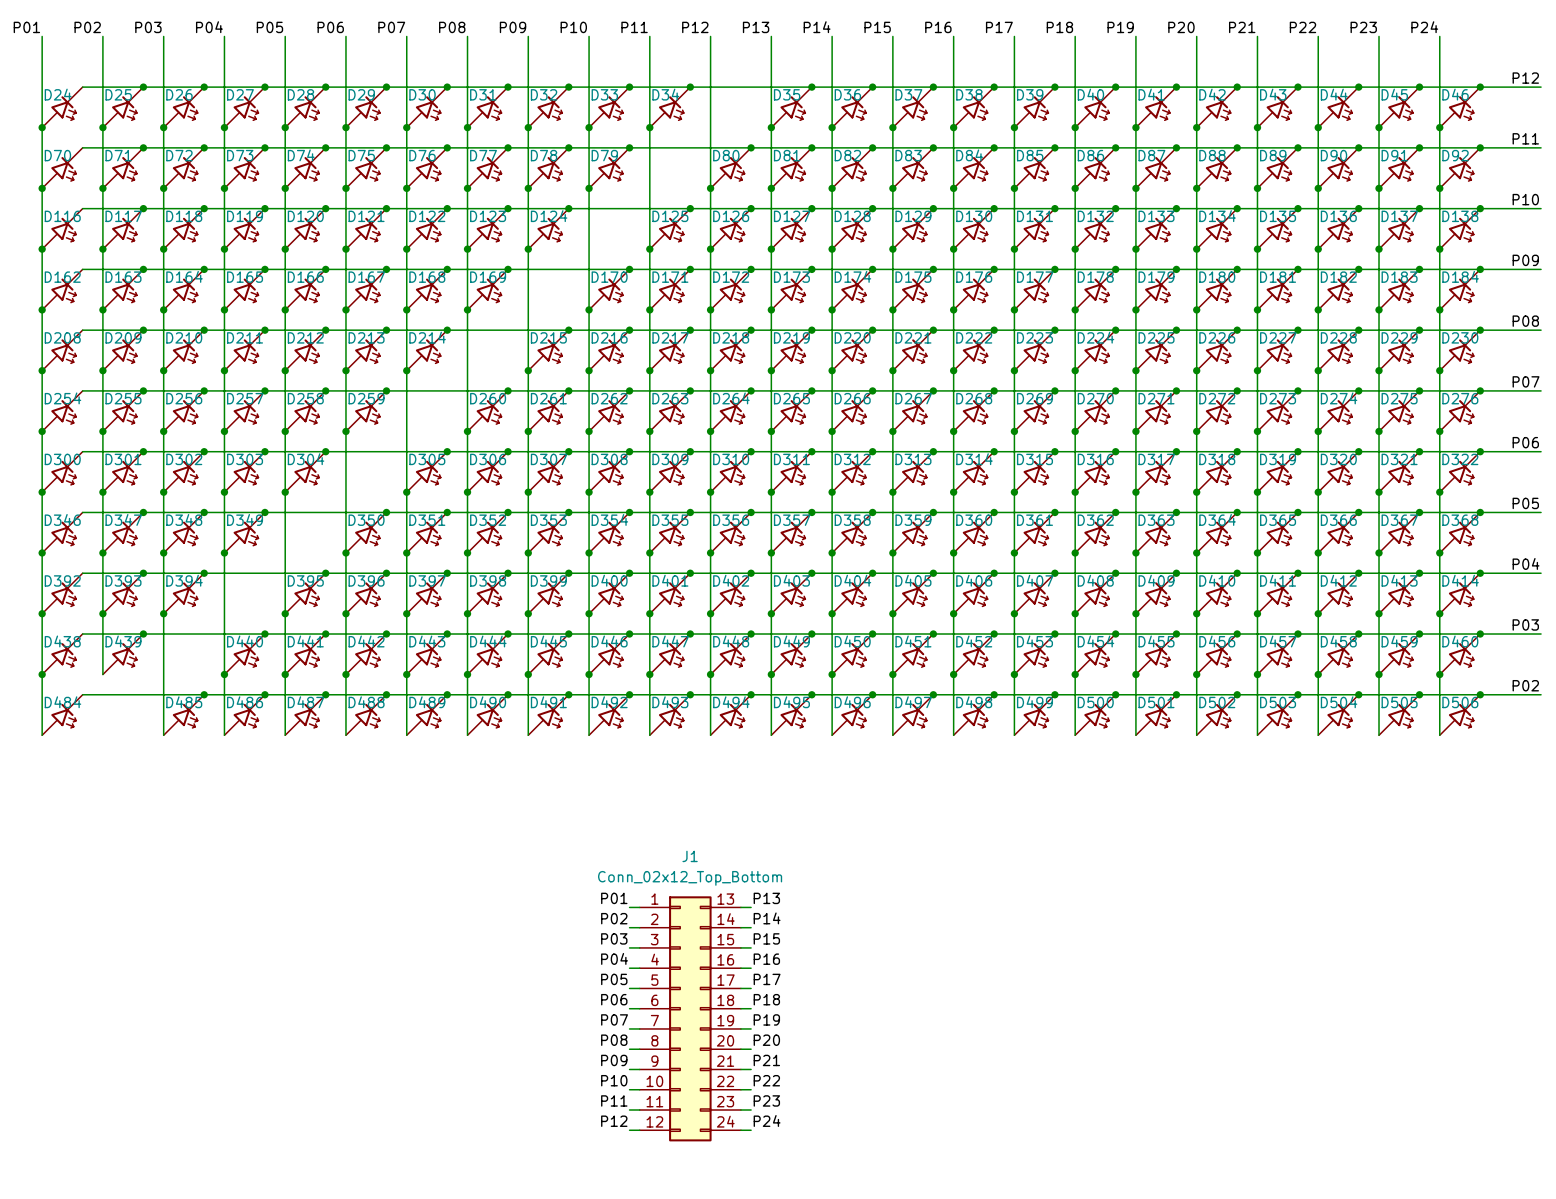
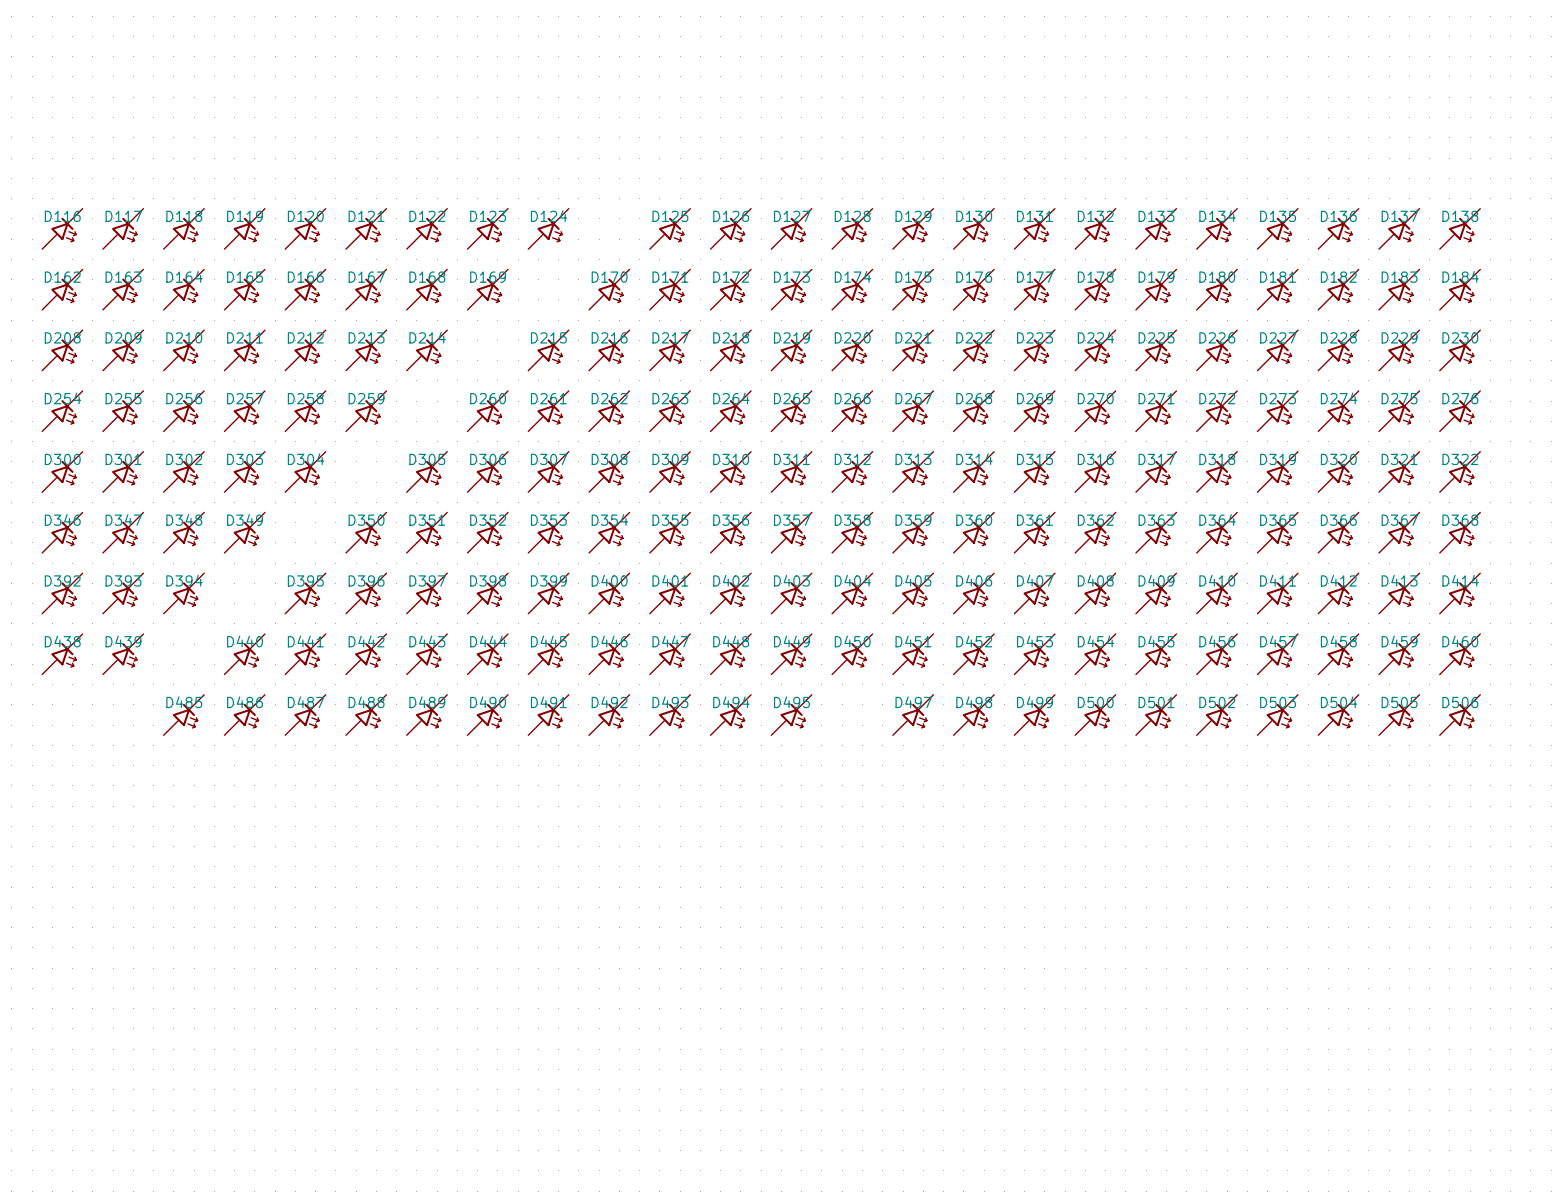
label: P01 (26, 27) -> none
label: P02 (87, 27) -> none
label: P03 (148, 27) -> none
label: P04 (209, 27) -> none
label: P05 (269, 27) -> none
label: P06 (330, 27) -> none
label: P07 (391, 27) -> none
label: P08 (452, 27) -> none
label: P09 (513, 27) -> none
label: P10 (573, 27) -> none
label: P11 (634, 27) -> none
label: P12 (695, 27) -> none
label: P13 (756, 27) -> none
label: P14 (817, 27) -> none
label: P15 (877, 27) -> none
label: P16 (938, 27) -> none
label: P17 (999, 27) -> none
label: P18 (1059, 27) -> none
label: P19 (1120, 27) -> none
label: P20 (1181, 27) -> none
label: P21 (1242, 27) -> none
label: P22 (1302, 27) -> none
label: P23 (1363, 27) -> none
label: P24 (1424, 27) -> none
wire: (42, 36) (42, 735) -> none
wire: (102, 36) (102, 674) -> none
wire: (163, 36) (163, 735) -> none
wire: (224, 36) (224, 735) -> none
wire: (285, 36) (285, 735) -> none
wire: (345, 36) (345, 735) -> none
wire: (406, 36) (406, 735) -> none
wire: (467, 36) (467, 735) -> none
wire: (528, 36) (528, 735) -> none
wire: (589, 36) (589, 735) -> none
wire: (649, 36) (649, 735) -> none
wire: (710, 36) (710, 735) -> none
wire: (771, 36) (771, 735) -> none
wire: (832, 36) (832, 735) -> none
wire: (892, 36) (892, 735) -> none
wire: (953, 36) (953, 735) -> none
wire: (1014, 36) (1014, 735) -> none
wire: (1075, 36) (1075, 735) -> none
wire: (1135, 36) (1135, 735) -> none
wire: (1196, 36) (1196, 735) -> none
wire: (1257, 36) (1257, 735) -> none
wire: (1318, 36) (1318, 735) -> none
wire: (1379, 36) (1379, 735) -> none
wire: (1439, 36) (1439, 735) -> none
label: P12 (1525, 78) -> none
wire: (82, 87) (1541, 87) -> none
junction: (143, 87) -> none
junction: (204, 87) -> none
junction: (264, 87) -> none
junction: (325, 87) -> none
junction: (386, 87) -> none
junction: (447, 87) -> none
junction: (508, 87) -> none
junction: (568, 87) -> none
junction: (629, 87) -> none
junction: (690, 87) -> none
junction: (811, 87) -> none
junction: (872, 87) -> none
junction: (933, 87) -> none
junction: (994, 87) -> none
junction: (1054, 87) -> none
junction: (1115, 87) -> none
junction: (1176, 87) -> none
junction: (1237, 87) -> none
junction: (1297, 87) -> none
junction: (1358, 87) -> none
junction: (1419, 87) -> none
junction: (1480, 87) -> none
D24: (62, 107) -> none
D25: (123, 107) -> none
D26: (183, 107) -> none
D27: (244, 107) -> none
D28: (305, 107) -> none
D29: (366, 107) -> none
D30: (427, 107) -> none
D31: (487, 107) -> none
D32: (548, 107) -> none
D33: (609, 107) -> none
D34: (670, 107) -> none
D35: (791, 107) -> none
D36: (852, 107) -> none
D37: (913, 107) -> none
D38: (973, 107) -> none
D39: (1034, 107) -> none
D40: (1095, 107) -> none
D41: (1156, 107) -> none
D42: (1216, 107) -> none
D43: (1277, 107) -> none
D44: (1338, 107) -> none
D45: (1399, 107) -> none
D46: (1460, 107) -> none
junction: (42, 127) -> none
junction: (102, 127) -> none
junction: (163, 127) -> none
junction: (224, 127) -> none
junction: (285, 127) -> none
junction: (345, 127) -> none
junction: (406, 127) -> none
junction: (467, 127) -> none
junction: (528, 127) -> none
junction: (589, 127) -> none
junction: (649, 127) -> none
junction: (771, 127) -> none
junction: (832, 127) -> none
junction: (892, 127) -> none
junction: (953, 127) -> none
junction: (1014, 127) -> none
junction: (1075, 127) -> none
junction: (1135, 127) -> none
junction: (1196, 127) -> none
junction: (1257, 127) -> none
junction: (1318, 127) -> none
junction: (1379, 127) -> none
junction: (1439, 127) -> none
label: P11 (1525, 138) -> none
wire: (82, 147) (1541, 147) -> none
junction: (143, 147) -> none
junction: (204, 147) -> none
junction: (264, 147) -> none
junction: (325, 147) -> none
junction: (386, 147) -> none
junction: (447, 147) -> none
junction: (508, 147) -> none
junction: (568, 147) -> none
junction: (629, 147) -> none
junction: (751, 147) -> none
junction: (811, 147) -> none
junction: (872, 147) -> none
junction: (933, 147) -> none
junction: (994, 147) -> none
junction: (1054, 147) -> none
junction: (1115, 147) -> none
junction: (1176, 147) -> none
junction: (1237, 147) -> none
junction: (1297, 147) -> none
junction: (1358, 147) -> none
junction: (1419, 147) -> none
junction: (1480, 147) -> none
D70: (62, 168) -> none
D71: (123, 168) -> none
D72: (183, 168) -> none
D73: (244, 168) -> none
D74: (305, 168) -> none
D75: (366, 168) -> none
D76: (427, 168) -> none
D77: (487, 168) -> none
D78: (548, 168) -> none
D79: (609, 168) -> none
D80: (730, 168) -> none
D81: (791, 168) -> none
D82: (852, 168) -> none
D83: (913, 168) -> none
D84: (973, 168) -> none
D85: (1034, 168) -> none
D86: (1095, 168) -> none
D87: (1156, 168) -> none
D88: (1216, 168) -> none
D89: (1277, 168) -> none
D90: (1338, 168) -> none
D91: (1399, 168) -> none
D92: (1460, 168) -> none
junction: (42, 188) -> none
junction: (102, 188) -> none
junction: (163, 188) -> none
junction: (224, 188) -> none
junction: (285, 188) -> none
junction: (345, 188) -> none
junction: (406, 188) -> none
junction: (467, 188) -> none
junction: (528, 188) -> none
junction: (589, 188) -> none
junction: (710, 188) -> none
junction: (771, 188) -> none
junction: (832, 188) -> none
junction: (892, 188) -> none
junction: (953, 188) -> none
junction: (1014, 188) -> none
junction: (1075, 188) -> none
junction: (1135, 188) -> none
junction: (1196, 188) -> none
junction: (1257, 188) -> none
junction: (1318, 188) -> none
junction: (1379, 188) -> none
junction: (1439, 188) -> none
label: P10 (1525, 199) -> none
wire: (82, 208) (1541, 208) -> none
junction: (143, 208) -> none
junction: (204, 208) -> none
junction: (264, 208) -> none
junction: (325, 208) -> none
junction: (386, 208) -> none
junction: (447, 208) -> none
junction: (508, 208) -> none
junction: (568, 208) -> none
junction: (690, 208) -> none
junction: (751, 208) -> none
junction: (811, 208) -> none
junction: (872, 208) -> none
junction: (933, 208) -> none
junction: (994, 208) -> none
junction: (1054, 208) -> none
junction: (1115, 208) -> none
junction: (1176, 208) -> none
junction: (1237, 208) -> none
junction: (1297, 208) -> none
junction: (1358, 208) -> none
junction: (1419, 208) -> none
junction: (1480, 208) -> none
junction: (42, 249) -> none
junction: (102, 249) -> none
junction: (163, 249) -> none
junction: (224, 249) -> none
junction: (285, 249) -> none
junction: (345, 249) -> none
junction: (406, 249) -> none
junction: (467, 249) -> none
junction: (528, 249) -> none
junction: (649, 249) -> none
junction: (710, 249) -> none
junction: (771, 249) -> none
junction: (832, 249) -> none
junction: (892, 249) -> none
junction: (953, 249) -> none
junction: (1014, 249) -> none
junction: (1075, 249) -> none
junction: (1135, 249) -> none
junction: (1196, 249) -> none
junction: (1257, 249) -> none
junction: (1318, 249) -> none
junction: (1379, 249) -> none
junction: (1439, 249) -> none
label: P09 (1525, 260) -> none
wire: (82, 269) (1541, 269) -> none
junction: (143, 269) -> none
junction: (204, 269) -> none
junction: (264, 269) -> none
junction: (325, 269) -> none
junction: (386, 269) -> none
junction: (447, 269) -> none
junction: (508, 269) -> none
junction: (629, 269) -> none
junction: (690, 269) -> none
junction: (751, 269) -> none
junction: (811, 269) -> none
junction: (872, 269) -> none
junction: (933, 269) -> none
junction: (994, 269) -> none
junction: (1054, 269) -> none
junction: (1115, 269) -> none
junction: (1176, 269) -> none
junction: (1237, 269) -> none
junction: (1297, 269) -> none
junction: (1358, 269) -> none
junction: (1419, 269) -> none
junction: (1480, 269) -> none
junction: (42, 309) -> none
junction: (102, 309) -> none
junction: (163, 309) -> none
junction: (224, 309) -> none
junction: (285, 309) -> none
junction: (345, 309) -> none
junction: (406, 309) -> none
junction: (467, 309) -> none
junction: (589, 309) -> none
junction: (649, 309) -> none
junction: (710, 309) -> none
junction: (771, 309) -> none
junction: (832, 309) -> none
junction: (892, 309) -> none
junction: (953, 309) -> none
junction: (1014, 309) -> none
junction: (1075, 309) -> none
junction: (1135, 309) -> none
junction: (1196, 309) -> none
junction: (1257, 309) -> none
junction: (1318, 309) -> none
junction: (1379, 309) -> none
junction: (1439, 309) -> none
label: P08 (1525, 321) -> none
wire: (82, 330) (1541, 330) -> none
junction: (143, 330) -> none
junction: (204, 330) -> none
junction: (264, 330) -> none
junction: (325, 330) -> none
junction: (386, 330) -> none
junction: (447, 330) -> none
junction: (568, 330) -> none
junction: (629, 330) -> none
junction: (690, 330) -> none
junction: (751, 330) -> none
junction: (811, 330) -> none
junction: (872, 330) -> none
junction: (933, 330) -> none
junction: (994, 330) -> none
junction: (1054, 330) -> none
junction: (1115, 330) -> none
junction: (1176, 330) -> none
junction: (1237, 330) -> none
junction: (1297, 330) -> none
junction: (1358, 330) -> none
junction: (1419, 330) -> none
junction: (1480, 330) -> none
junction: (42, 370) -> none
junction: (102, 370) -> none
junction: (163, 370) -> none
junction: (224, 370) -> none
junction: (285, 370) -> none
junction: (345, 370) -> none
junction: (406, 370) -> none
junction: (528, 370) -> none
junction: (589, 370) -> none
junction: (649, 370) -> none
junction: (710, 370) -> none
junction: (771, 370) -> none
junction: (832, 370) -> none
junction: (892, 370) -> none
junction: (953, 370) -> none
junction: (1014, 370) -> none
junction: (1075, 370) -> none
junction: (1135, 370) -> none
junction: (1196, 370) -> none
junction: (1257, 370) -> none
junction: (1318, 370) -> none
junction: (1379, 370) -> none
junction: (1439, 370) -> none
label: P07 (1526, 381) -> none
wire: (82, 390) (1541, 390) -> none
junction: (143, 390) -> none
junction: (204, 390) -> none
junction: (264, 390) -> none
junction: (325, 390) -> none
junction: (386, 390) -> none
junction: (508, 390) -> none
junction: (568, 390) -> none
junction: (629, 390) -> none
junction: (690, 390) -> none
junction: (751, 390) -> none
junction: (811, 390) -> none
junction: (872, 390) -> none
junction: (933, 390) -> none
junction: (994, 390) -> none
junction: (1054, 390) -> none
junction: (1115, 390) -> none
junction: (1176, 390) -> none
junction: (1237, 390) -> none
junction: (1297, 390) -> none
junction: (1358, 390) -> none
junction: (1419, 390) -> none
junction: (1480, 390) -> none
junction: (42, 431) -> none
junction: (102, 431) -> none
junction: (163, 431) -> none
junction: (224, 431) -> none
junction: (285, 431) -> none
junction: (345, 431) -> none
junction: (467, 431) -> none
junction: (528, 431) -> none
junction: (589, 431) -> none
junction: (649, 431) -> none
junction: (710, 431) -> none
junction: (771, 431) -> none
junction: (832, 431) -> none
junction: (892, 431) -> none
junction: (953, 431) -> none
junction: (1014, 431) -> none
junction: (1075, 431) -> none
junction: (1135, 431) -> none
junction: (1196, 431) -> none
junction: (1257, 431) -> none
junction: (1318, 431) -> none
junction: (1379, 431) -> none
junction: (1439, 431) -> none
label: P06 (1525, 442) -> none
wire: (82, 451) (1541, 451) -> none
junction: (143, 451) -> none
junction: (204, 451) -> none
junction: (264, 451) -> none
junction: (325, 451) -> none
junction: (447, 451) -> none
junction: (508, 451) -> none
junction: (568, 451) -> none
junction: (629, 451) -> none
junction: (690, 451) -> none
junction: (751, 451) -> none
junction: (811, 451) -> none
junction: (872, 451) -> none
junction: (933, 451) -> none
junction: (994, 451) -> none
junction: (1054, 451) -> none
junction: (1115, 451) -> none
junction: (1176, 451) -> none
junction: (1237, 451) -> none
junction: (1297, 451) -> none
junction: (1358, 451) -> none
junction: (1419, 451) -> none
junction: (1480, 451) -> none
junction: (42, 492) -> none
junction: (102, 492) -> none
junction: (163, 492) -> none
junction: (224, 492) -> none
junction: (285, 492) -> none
junction: (406, 492) -> none
junction: (467, 492) -> none
junction: (528, 492) -> none
junction: (589, 492) -> none
junction: (649, 492) -> none
junction: (710, 492) -> none
junction: (771, 492) -> none
junction: (832, 492) -> none
junction: (892, 492) -> none
junction: (953, 492) -> none
junction: (1014, 492) -> none
junction: (1075, 492) -> none
junction: (1135, 492) -> none
junction: (1196, 492) -> none
junction: (1257, 492) -> none
junction: (1318, 492) -> none
junction: (1379, 492) -> none
junction: (1439, 492) -> none
label: P05 (1525, 503) -> none
wire: (82, 512) (1541, 512) -> none
junction: (143, 512) -> none
junction: (204, 512) -> none
junction: (264, 512) -> none
junction: (386, 512) -> none
junction: (447, 512) -> none
junction: (508, 512) -> none
junction: (568, 512) -> none
junction: (629, 512) -> none
junction: (690, 512) -> none
junction: (751, 512) -> none
junction: (811, 512) -> none
junction: (872, 512) -> none
junction: (933, 512) -> none
junction: (994, 512) -> none
junction: (1054, 512) -> none
junction: (1115, 512) -> none
junction: (1176, 512) -> none
junction: (1237, 512) -> none
junction: (1297, 512) -> none
junction: (1358, 512) -> none
junction: (1419, 512) -> none
junction: (1480, 512) -> none
junction: (42, 552) -> none
junction: (102, 552) -> none
junction: (163, 552) -> none
junction: (224, 552) -> none
junction: (345, 552) -> none
junction: (406, 552) -> none
junction: (467, 552) -> none
junction: (528, 552) -> none
junction: (589, 552) -> none
junction: (649, 552) -> none
junction: (710, 552) -> none
junction: (771, 552) -> none
junction: (832, 552) -> none
junction: (892, 552) -> none
junction: (953, 552) -> none
junction: (1014, 552) -> none
junction: (1075, 552) -> none
junction: (1135, 552) -> none
junction: (1196, 552) -> none
junction: (1257, 552) -> none
junction: (1318, 552) -> none
junction: (1379, 552) -> none
junction: (1439, 552) -> none
label: P04 (1526, 563) -> none
wire: (82, 573) (1541, 573) -> none
junction: (143, 573) -> none
junction: (204, 573) -> none
junction: (325, 573) -> none
junction: (386, 573) -> none
junction: (447, 573) -> none
junction: (508, 573) -> none
junction: (568, 573) -> none
junction: (629, 573) -> none
junction: (690, 573) -> none
junction: (751, 573) -> none
junction: (811, 573) -> none
junction: (872, 573) -> none
junction: (933, 573) -> none
junction: (994, 573) -> none
junction: (1054, 573) -> none
junction: (1115, 573) -> none
junction: (1176, 573) -> none
junction: (1237, 573) -> none
junction: (1297, 573) -> none
junction: (1358, 573) -> none
junction: (1419, 573) -> none
junction: (1480, 573) -> none
junction: (42, 613) -> none
junction: (102, 613) -> none
junction: (163, 613) -> none
junction: (285, 613) -> none
junction: (345, 613) -> none
junction: (406, 613) -> none
junction: (467, 613) -> none
junction: (528, 613) -> none
junction: (589, 613) -> none
junction: (649, 613) -> none
junction: (710, 613) -> none
junction: (771, 613) -> none
junction: (832, 613) -> none
junction: (892, 613) -> none
junction: (953, 613) -> none
junction: (1014, 613) -> none
junction: (1075, 613) -> none
junction: (1135, 613) -> none
junction: (1196, 613) -> none
junction: (1257, 613) -> none
junction: (1318, 613) -> none
junction: (1379, 613) -> none
junction: (1439, 613) -> none
label: P03 (1525, 624) -> none
wire: (82, 634) (1541, 634) -> none
junction: (143, 634) -> none
junction: (264, 634) -> none
junction: (325, 634) -> none
junction: (386, 634) -> none
junction: (447, 634) -> none
junction: (508, 634) -> none
junction: (568, 634) -> none
junction: (629, 634) -> none
junction: (690, 634) -> none
junction: (751, 634) -> none
junction: (811, 634) -> none
junction: (872, 634) -> none
junction: (933, 634) -> none
junction: (994, 634) -> none
junction: (1054, 634) -> none
junction: (1115, 634) -> none
junction: (1176, 634) -> none
junction: (1237, 634) -> none
junction: (1297, 634) -> none
junction: (1358, 634) -> none
junction: (1419, 634) -> none
junction: (1480, 634) -> none
junction: (42, 674) -> none
junction: (224, 674) -> none
junction: (285, 674) -> none
junction: (345, 674) -> none
junction: (406, 674) -> none
junction: (467, 674) -> none
junction: (528, 674) -> none
junction: (589, 674) -> none
junction: (649, 674) -> none
junction: (710, 674) -> none
junction: (771, 674) -> none
junction: (832, 674) -> none
junction: (892, 674) -> none
junction: (953, 674) -> none
junction: (1014, 674) -> none
junction: (1075, 674) -> none
junction: (1135, 674) -> none
junction: (1196, 674) -> none
junction: (1257, 674) -> none
junction: (1318, 674) -> none
junction: (1379, 674) -> none
junction: (1439, 674) -> none
label: P02 (1525, 685) -> none
wire: (82, 694) (1541, 694) -> none
junction: (204, 694) -> none
junction: (264, 694) -> none
junction: (325, 694) -> none
junction: (386, 694) -> none
junction: (447, 694) -> none
junction: (508, 694) -> none
junction: (568, 694) -> none
junction: (629, 694) -> none
junction: (690, 694) -> none
junction: (751, 694) -> none
junction: (811, 694) -> none
junction: (872, 694) -> none
junction: (933, 694) -> none
junction: (994, 694) -> none
junction: (1054, 694) -> none
junction: (1115, 694) -> none
junction: (1176, 694) -> none
junction: (1237, 694) -> none
junction: (1297, 694) -> none
junction: (1358, 694) -> none
junction: (1419, 694) -> none
junction: (1480, 694) -> none
D484: (62, 715) -> none
D496: (852, 715) -> none
label: P01 (614, 898) -> none
label: P13 (766, 898) -> none
wire: (629, 907) (639, 907) -> none
wire: (740, 907) (751, 907) -> none
label: P02 (614, 918) -> none
label: P14 (767, 918) -> none
wire: (629, 927) (639, 927) -> none
wire: (740, 927) (751, 927) -> none
label: P03 (614, 938) -> none
label: P15 (766, 938) -> none
wire: (629, 947) (639, 947) -> none
wire: (740, 947) (751, 947) -> none
label: P04 (614, 958) -> none
label: P16 (766, 959) -> none
wire: (629, 968) (639, 968) -> none
wire: (740, 968) (751, 968) -> none
label: P05 (614, 979) -> none
label: P17 (767, 979) -> none
wire: (629, 988) (639, 988) -> none
wire: (740, 988) (751, 988) -> none
label: P06 (614, 999) -> none
label: P18 (766, 999) -> none
wire: (629, 1008) (639, 1008) -> none
wire: (740, 1008) (751, 1008) -> none
J1: Conn_02x12_Top_Bottom (690, 1018) -> none
label: P07 (614, 1019) -> none
label: P19 (766, 1019) -> none
wire: (629, 1028) (639, 1028) -> none
wire: (740, 1028) (751, 1028) -> none
label: P08 (614, 1040) -> none
label: P20 (766, 1040) -> none
wire: (629, 1049) (639, 1049) -> none
wire: (740, 1049) (751, 1049) -> none
label: P09 (614, 1060) -> none
label: P21 (766, 1060) -> none
wire: (629, 1069) (639, 1069) -> none
wire: (740, 1069) (751, 1069) -> none
label: P10 (614, 1080) -> none
label: P22 (766, 1080) -> none
wire: (629, 1089) (639, 1089) -> none
wire: (740, 1089) (751, 1089) -> none
label: P11 (614, 1100) -> none
label: P23 (766, 1100) -> none
wire: (629, 1110) (639, 1110) -> none
wire: (740, 1110) (751, 1110) -> none
label: P24 (767, 1120) -> none
label: P12 (614, 1121) -> none
wire: (629, 1130) (639, 1130) -> none
wire: (740, 1130) (751, 1130) -> none

